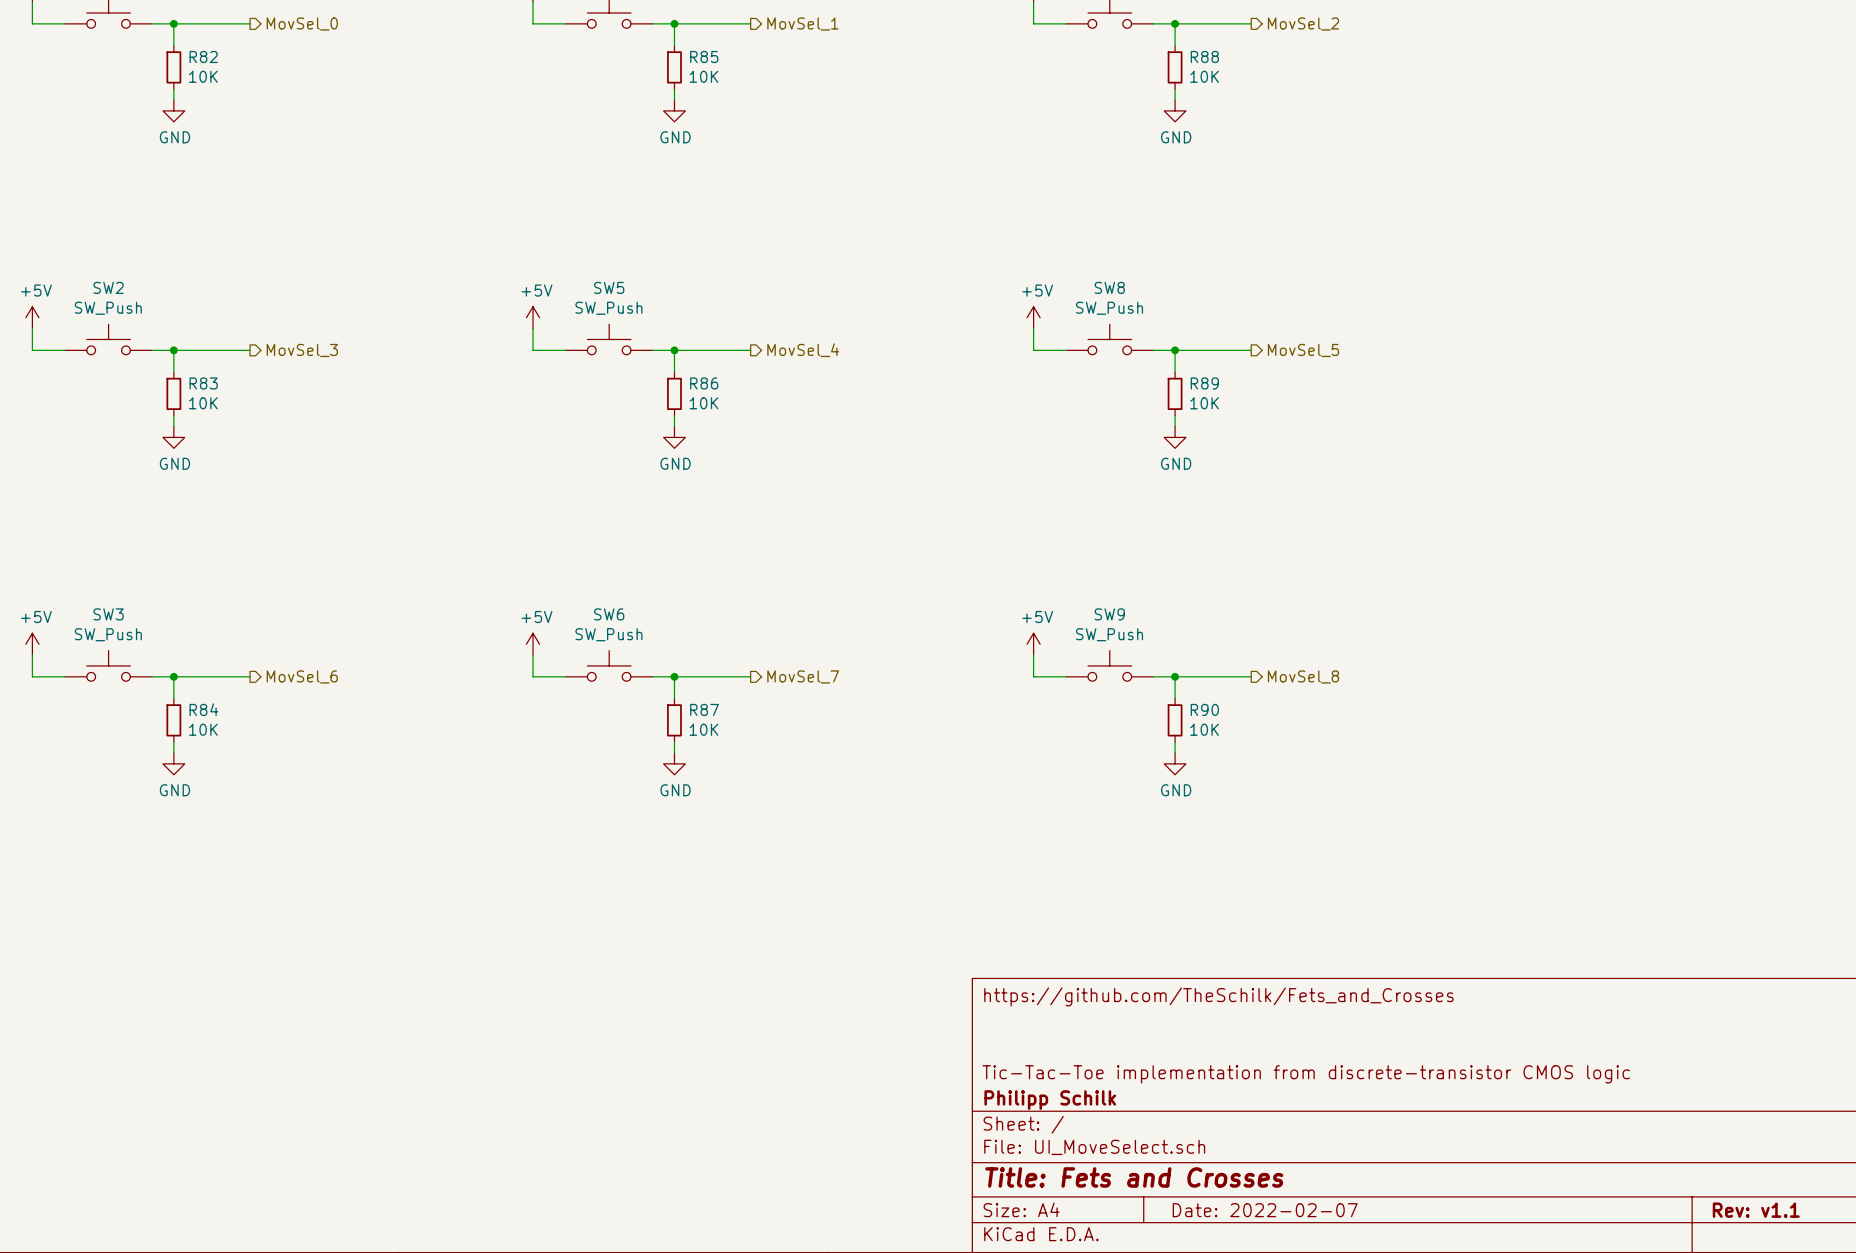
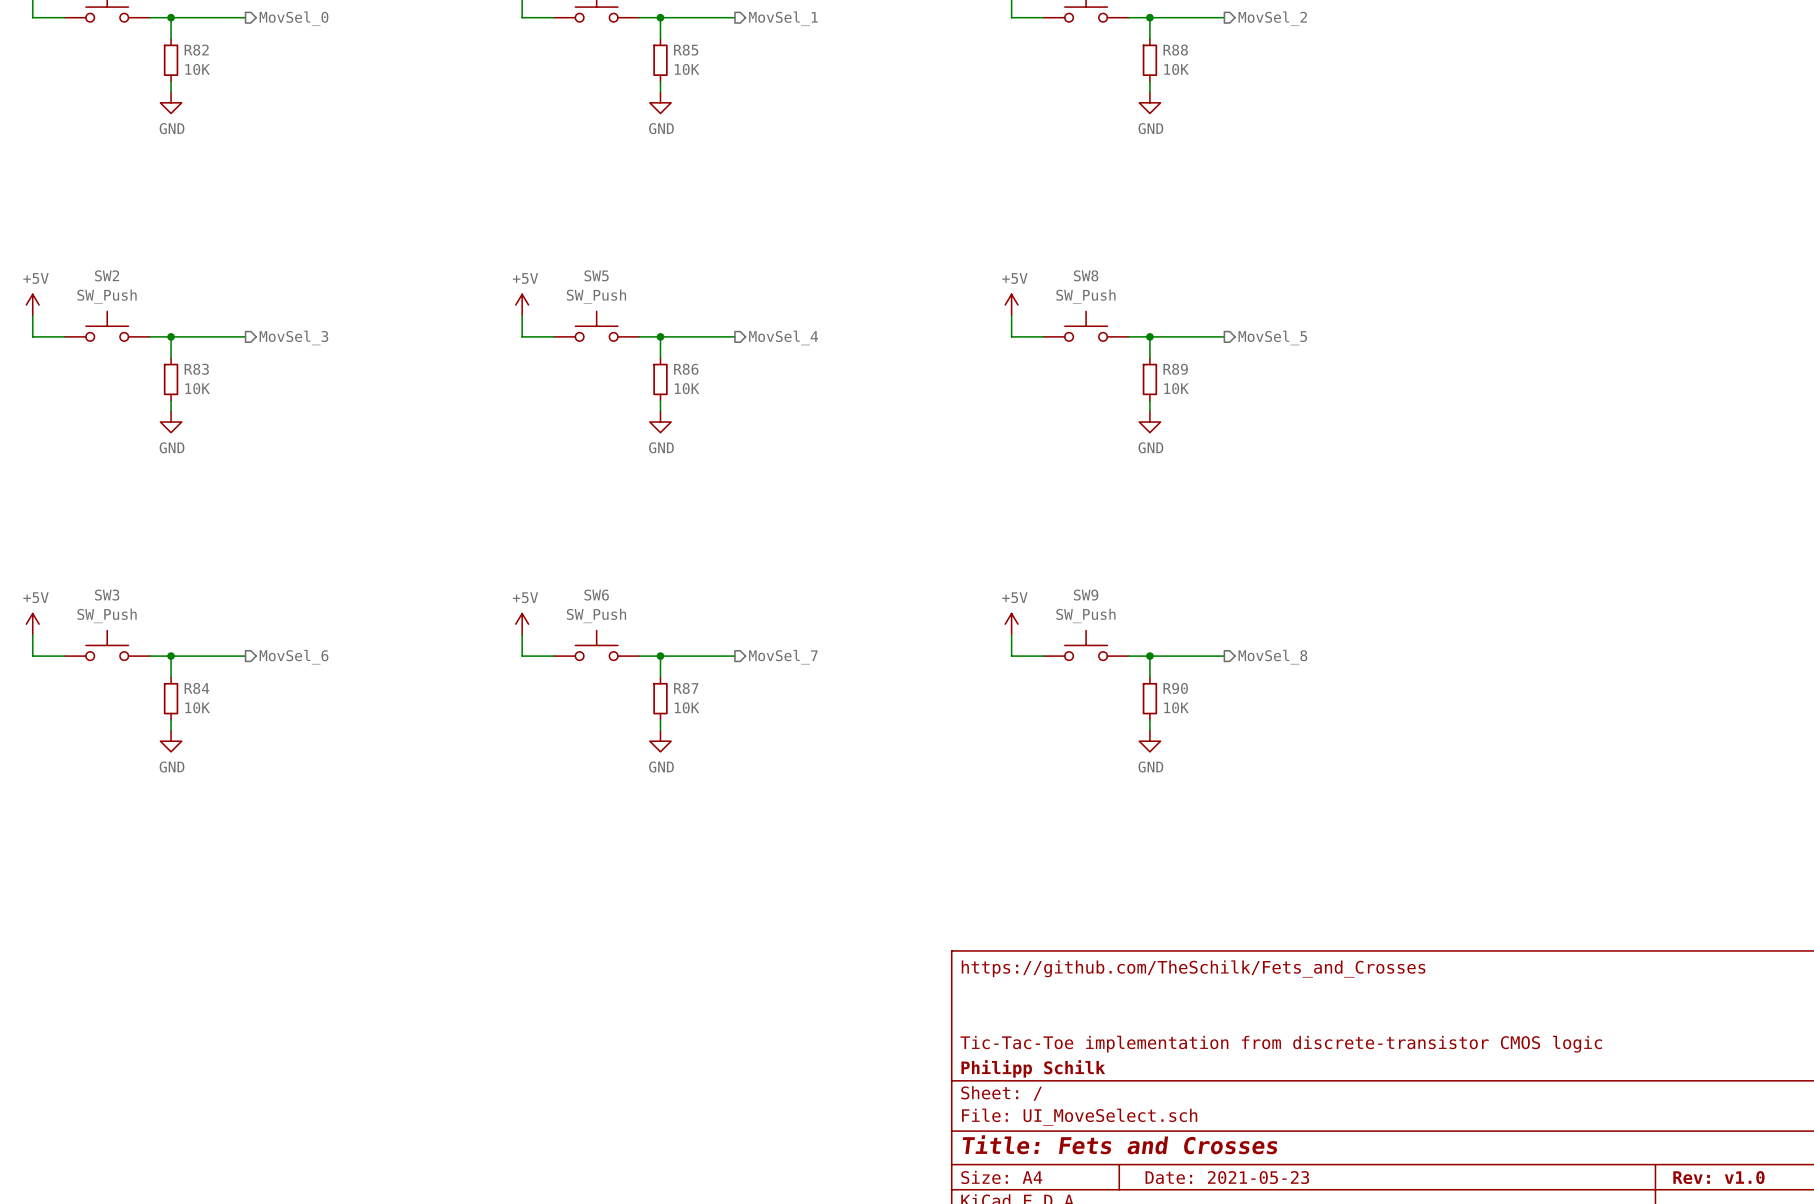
title block: Date: 2022-02-07 (1265, 1210) -> Date: 2021-05-23 (1227, 1177)
title block: Rev: v1.1 (1756, 1210) -> Rev: v1.0 (1718, 1177)

